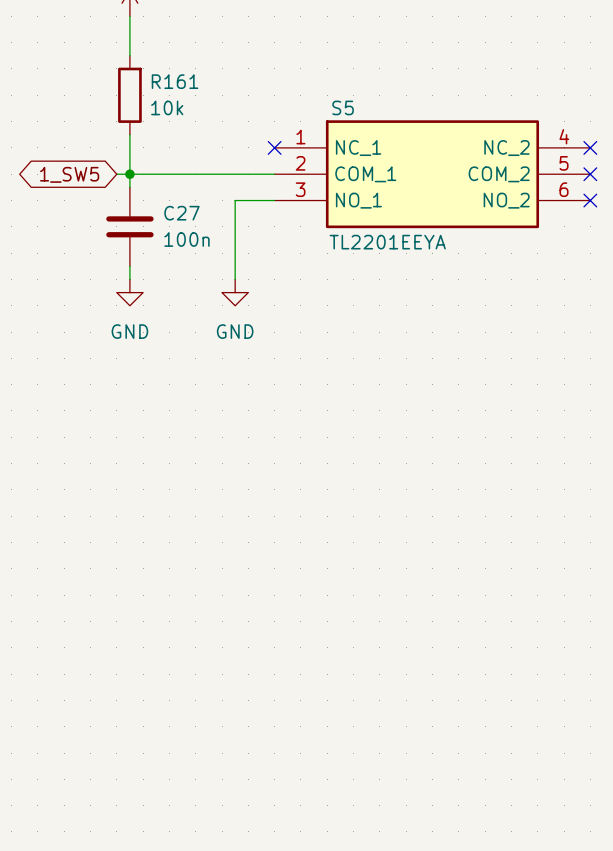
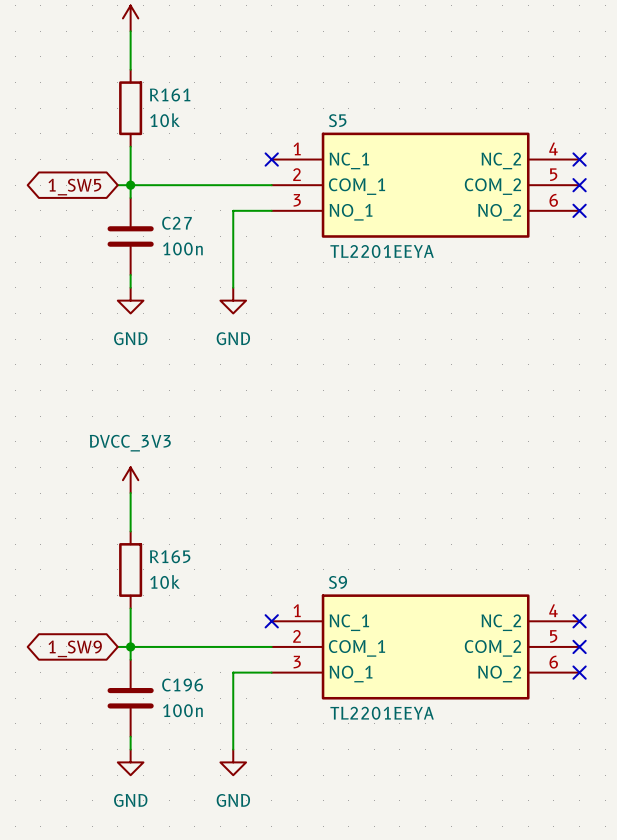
power symbol: none -> DVCC_3V3 (130, 480)
wire: none -> (130, 493) (130, 531)
R165: none -> 10k (130, 569)
wire: none -> (130, 608) (130, 659)
no-connect mark: none -> (271, 621)
no-connect mark: none -> (579, 621)
wire: none -> (117, 646) (271, 646)
junction: none -> (130, 646)
S9: none -> TL2201EEYA (425, 646)
no-connect mark: none -> (579, 646)
global label: none -> 1_SW9 (75, 648)
wire: none -> (271, 672) (233, 672) (233, 749)
no-connect mark: none -> (579, 672)
C196: none -> 100n (130, 698)
wire: none -> (130, 736) (130, 749)
power symbol: none -> GND (130, 762)
power symbol: none -> GND (233, 762)

